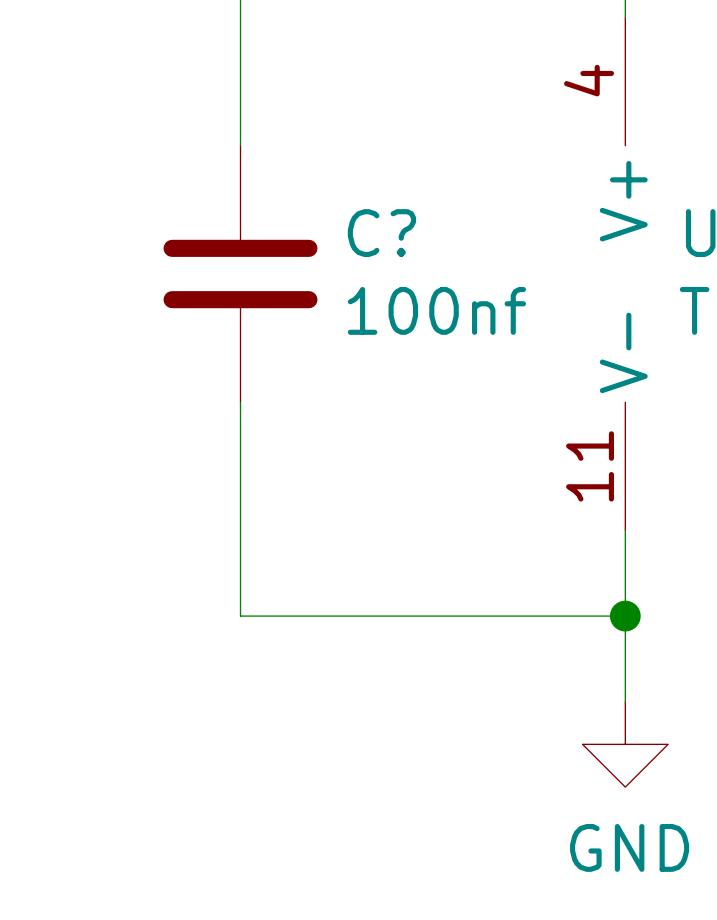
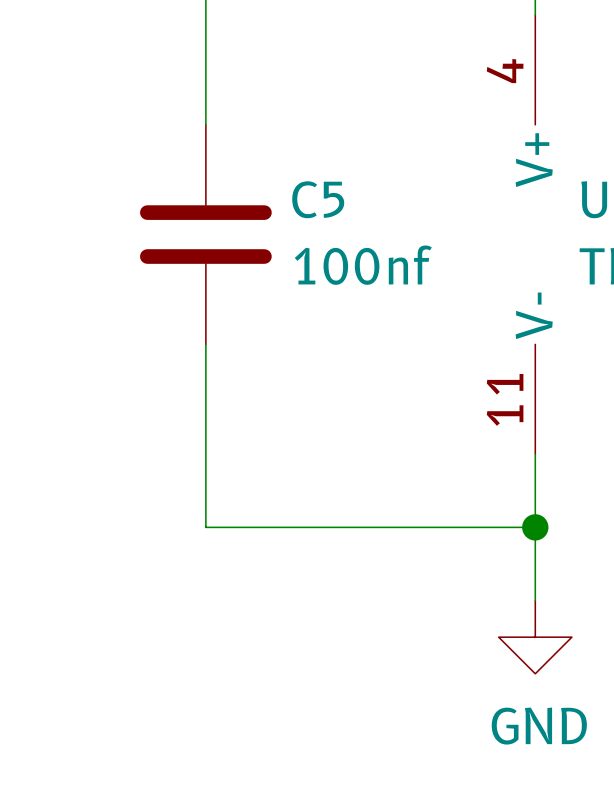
C? name: C? (381, 233) -> C5 (318, 199)

